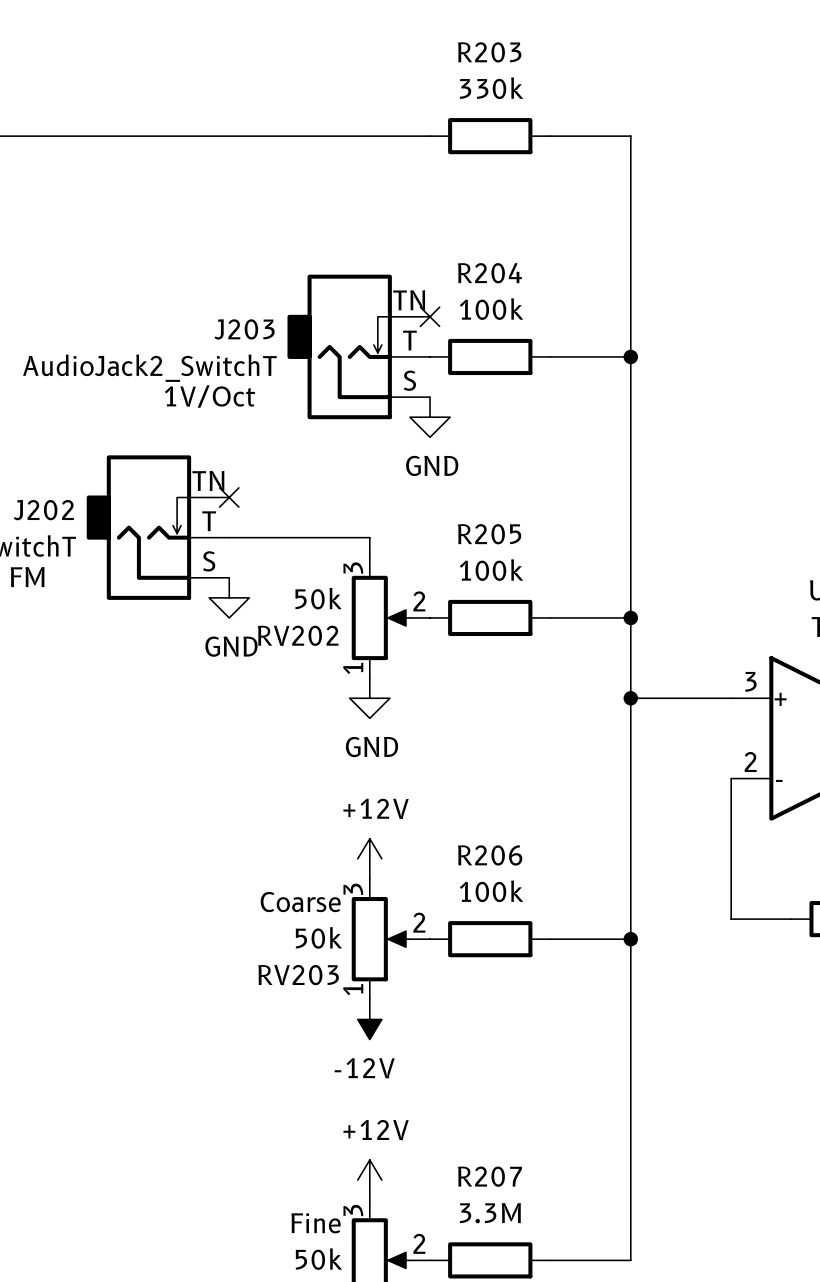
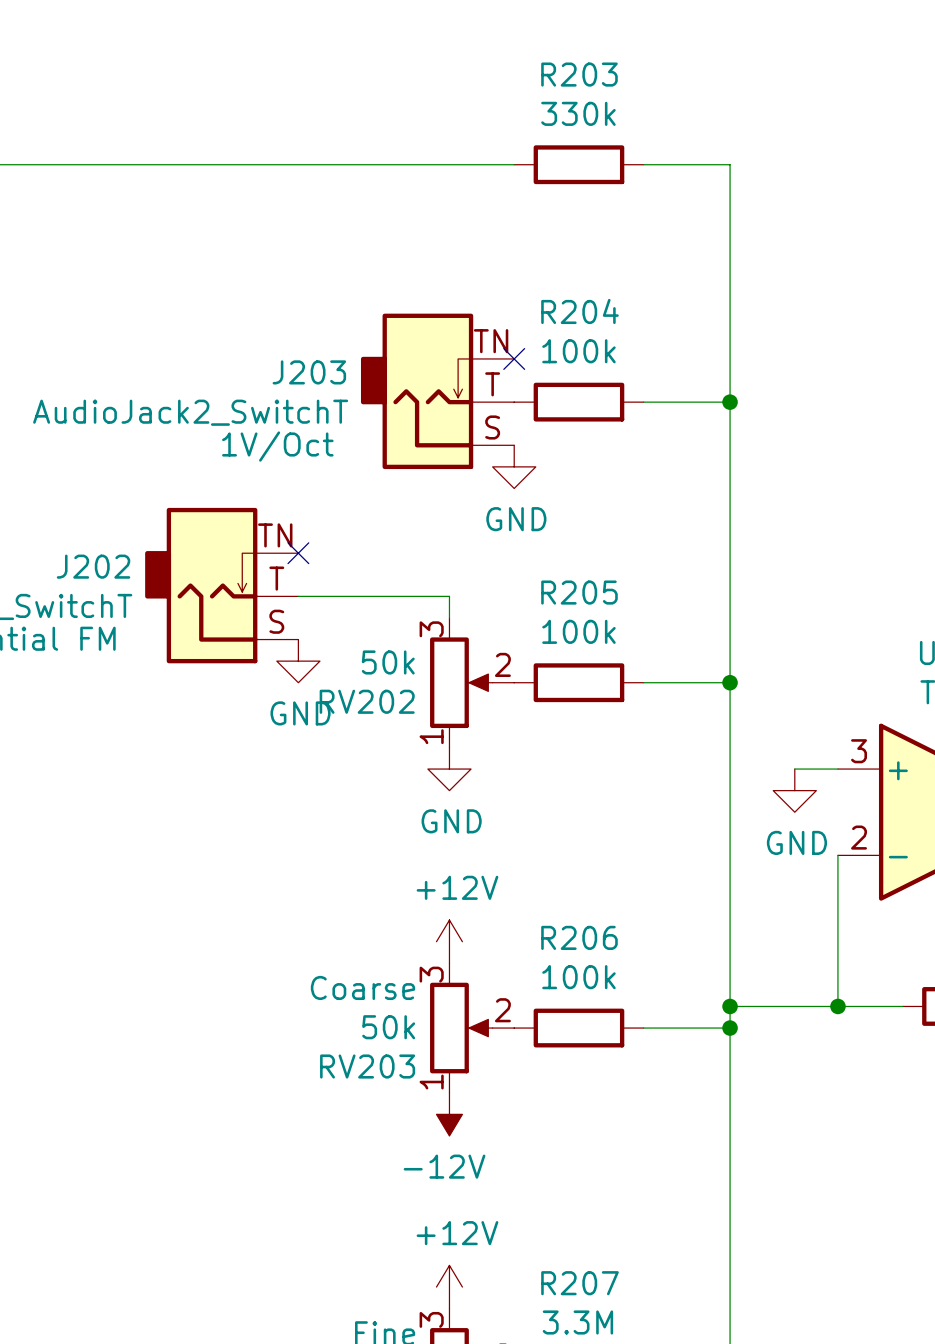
wire: (630, 698) (691, 698) -> none
junction: (630, 698) -> none
power symbol: none -> GND (794, 790)
wire: none -> (730, 1006) (837, 1006)
junction: none -> (730, 1006)
junction: none -> (837, 1006)

